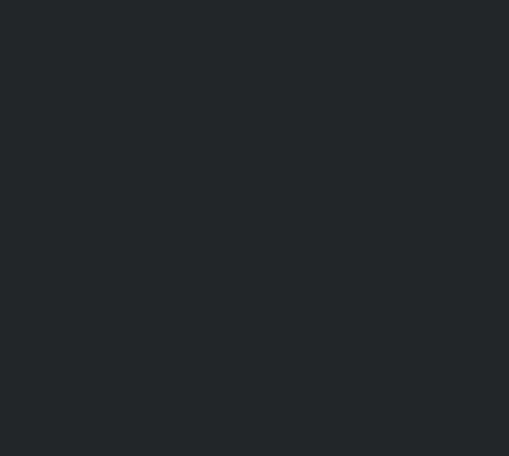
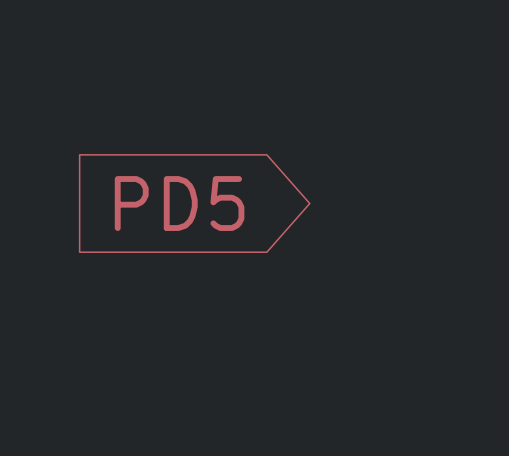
global label: none -> PD5 (179, 203)

